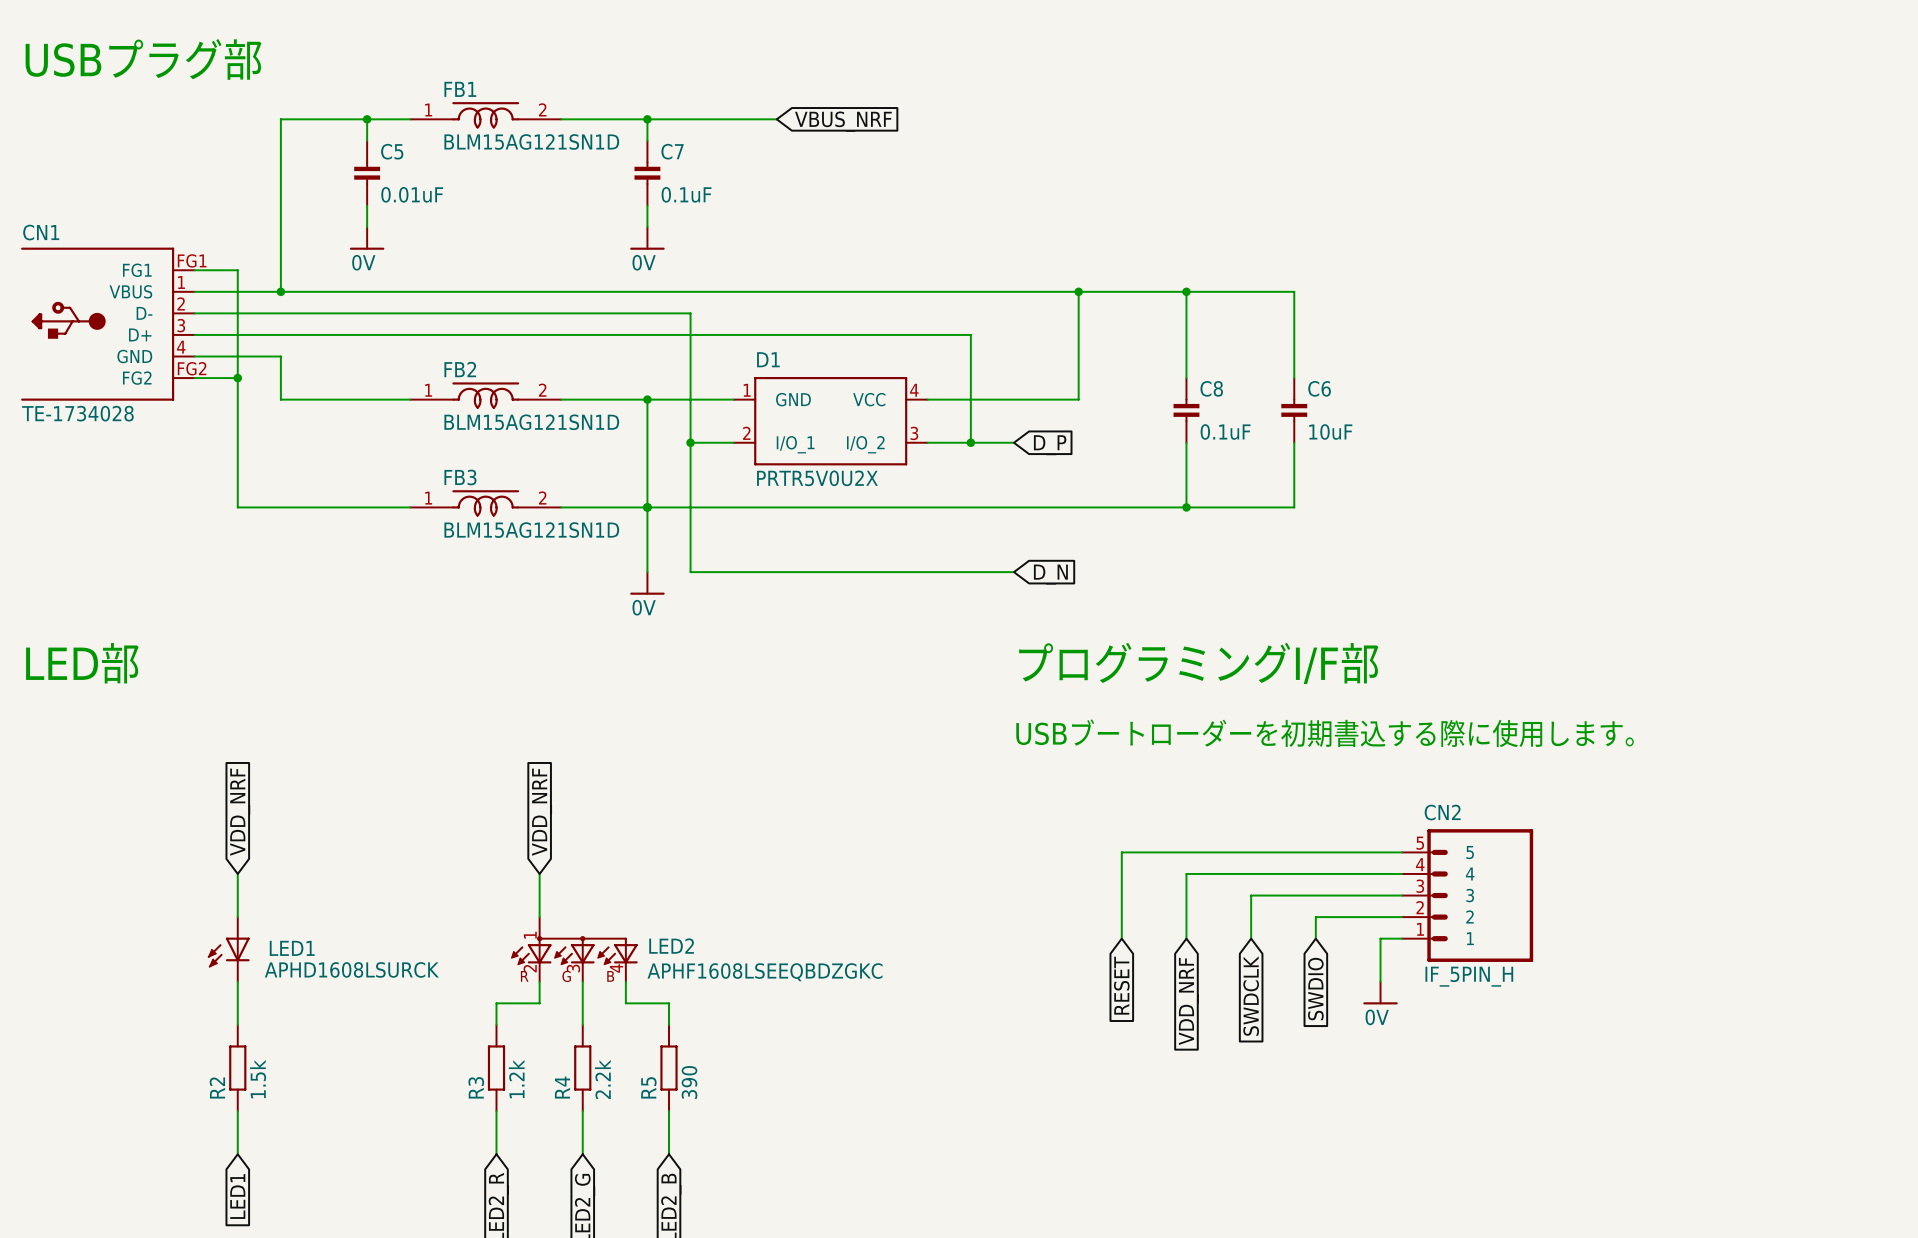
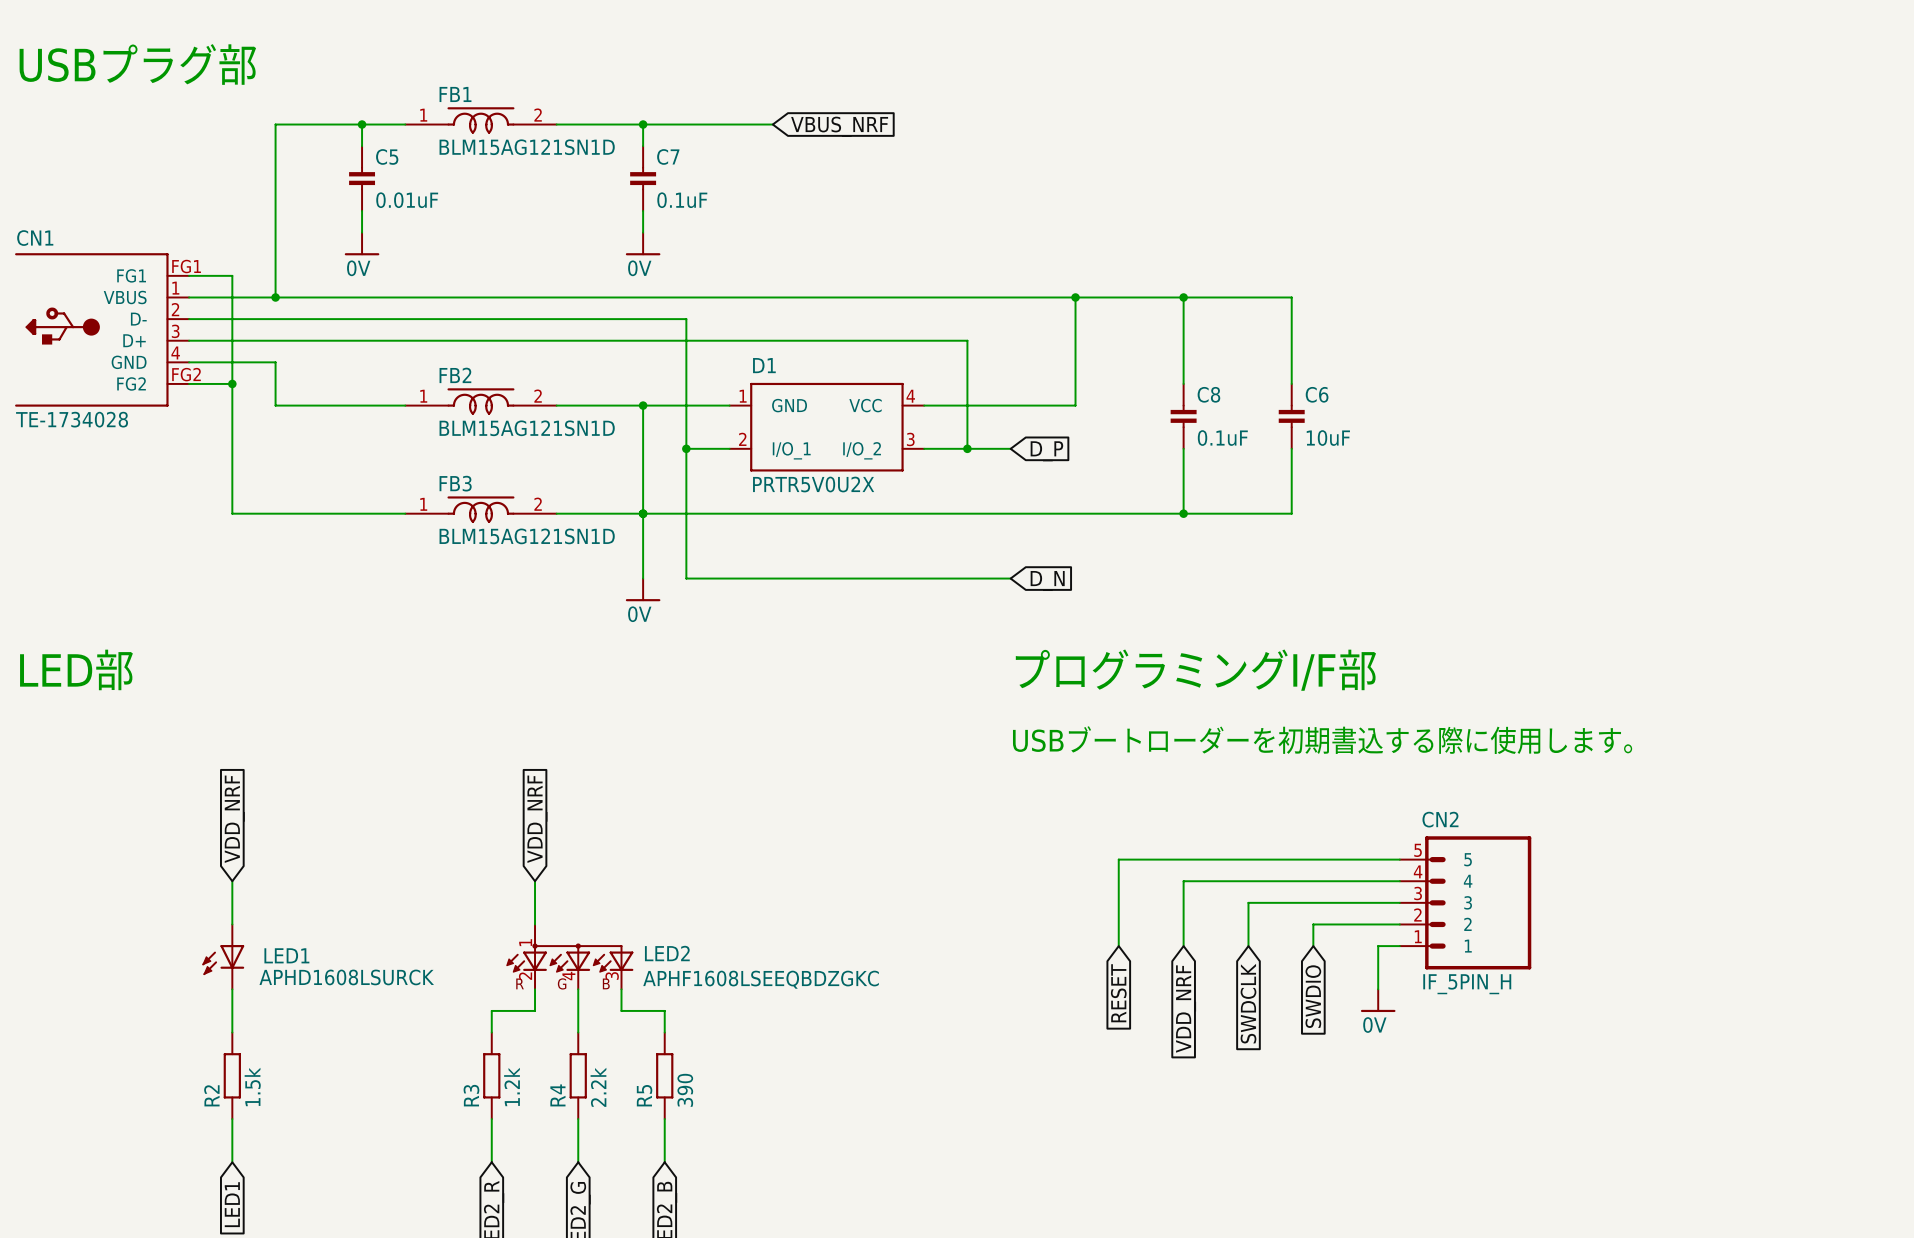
LED2 pin number: 3 (573, 968) -> 4 (568, 976)
LED2 pin number: 4 (616, 968) -> 3 (612, 975)

